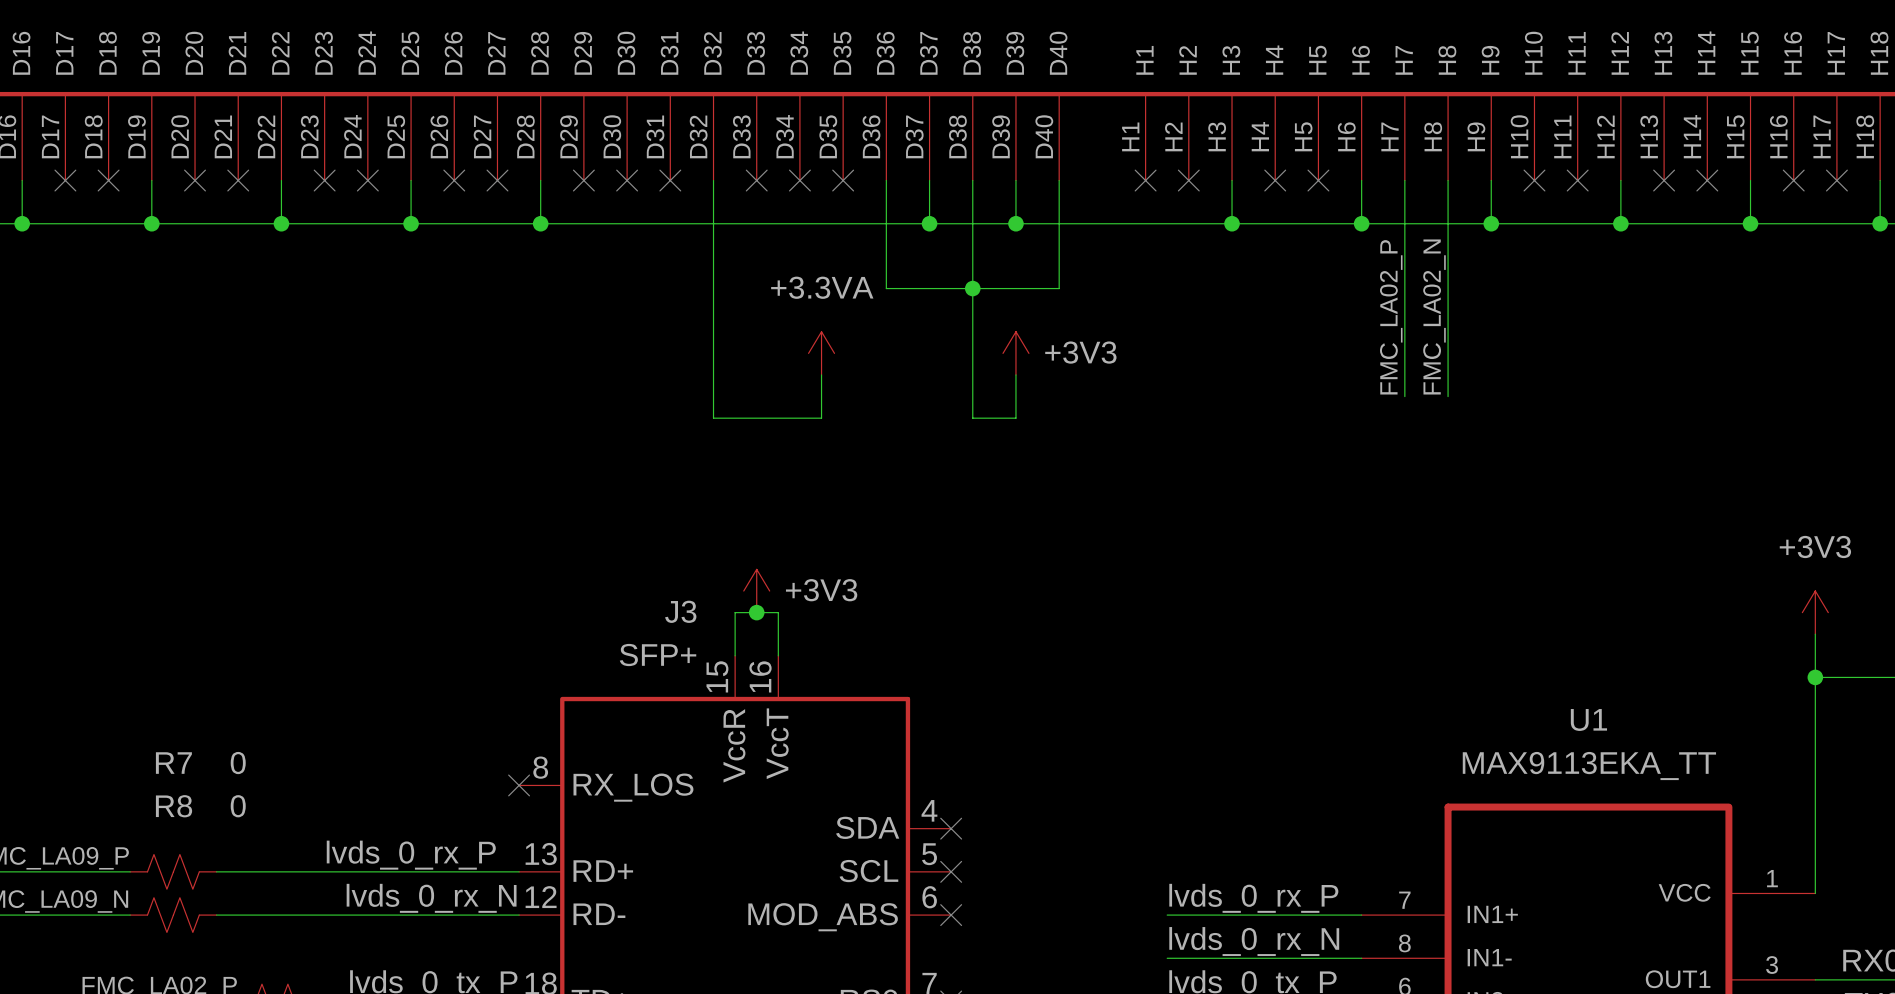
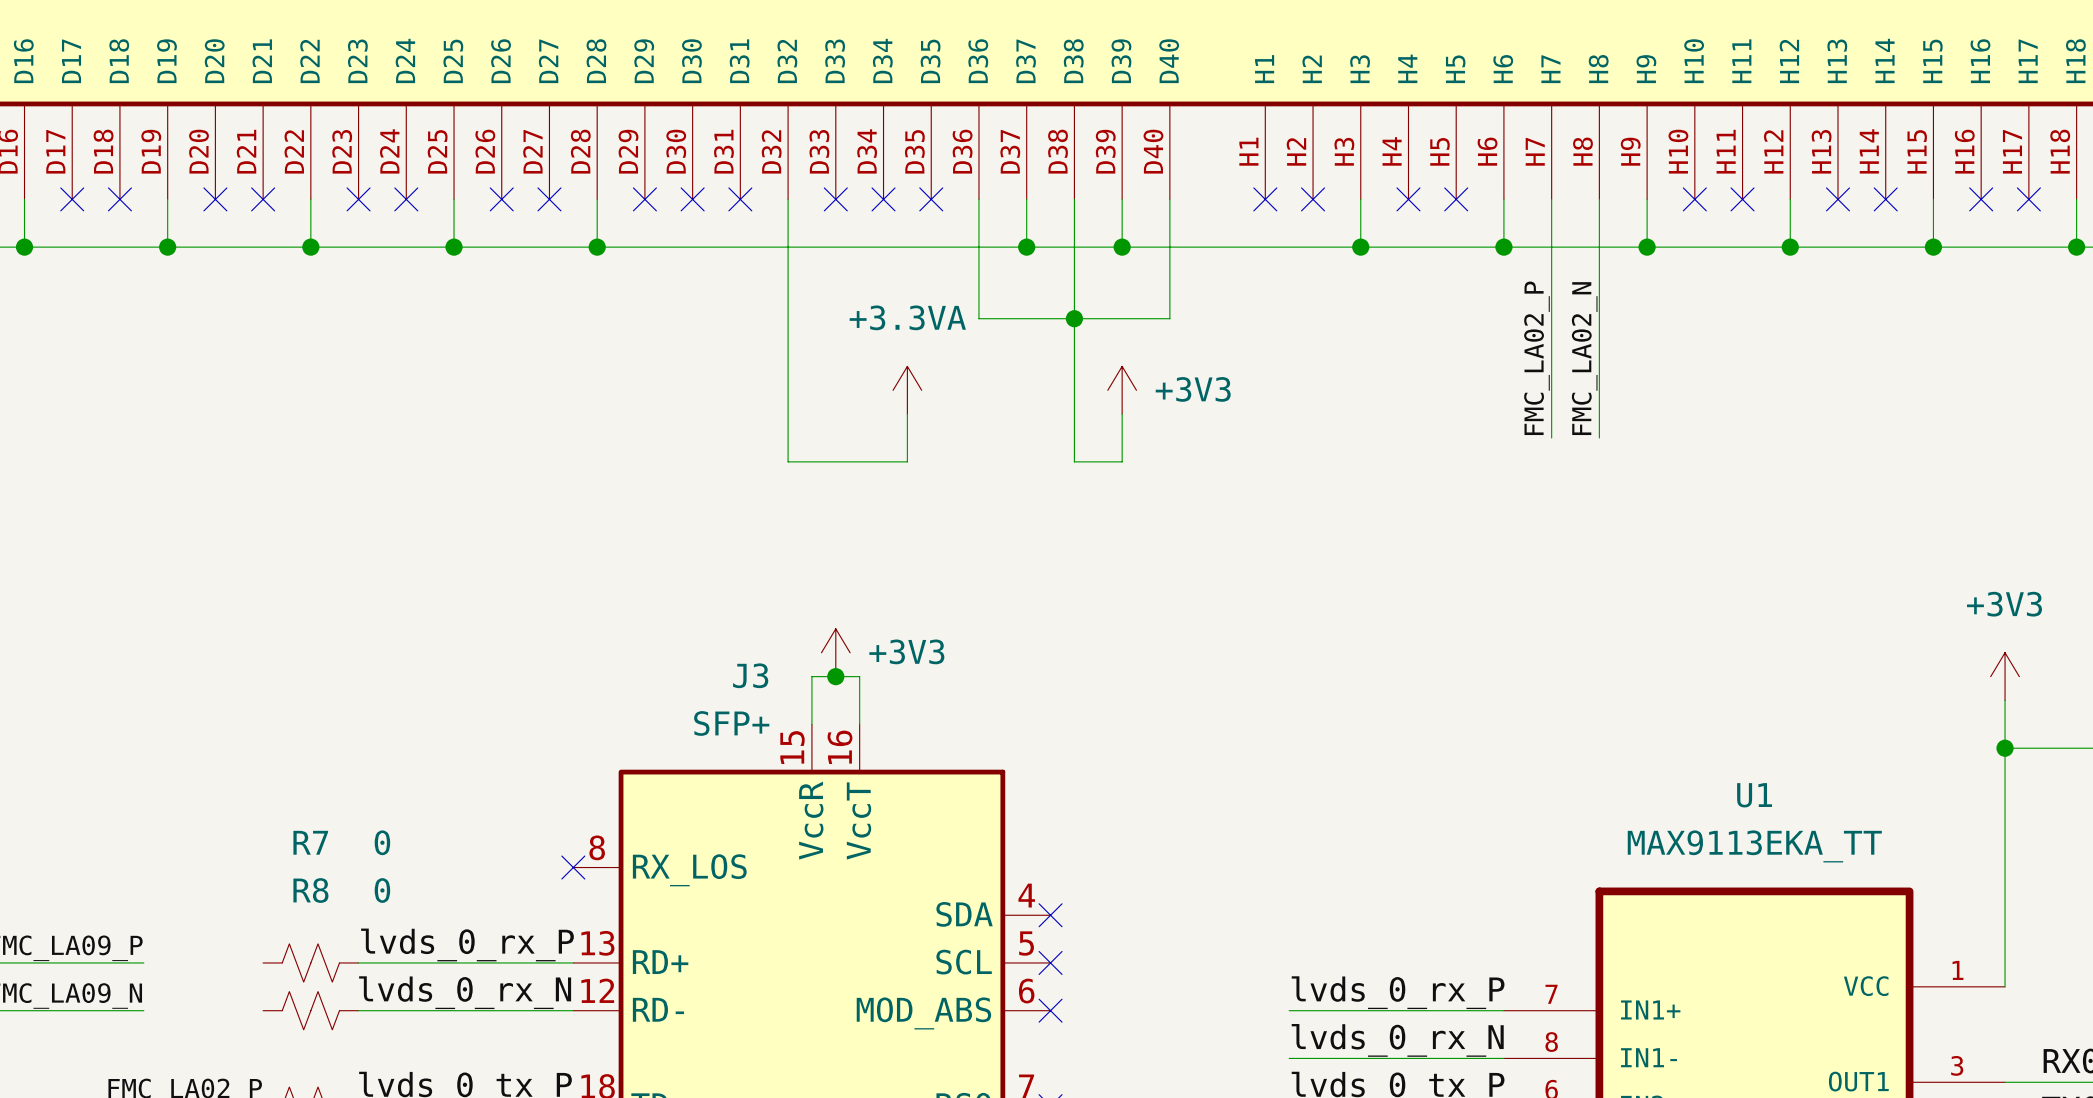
R7 position: (173, 871) -> (310, 962)
wire: (216, 871) (324, 871) -> none
R8 position: (173, 915) -> (310, 1010)
wire: (216, 915) (324, 915) -> none

